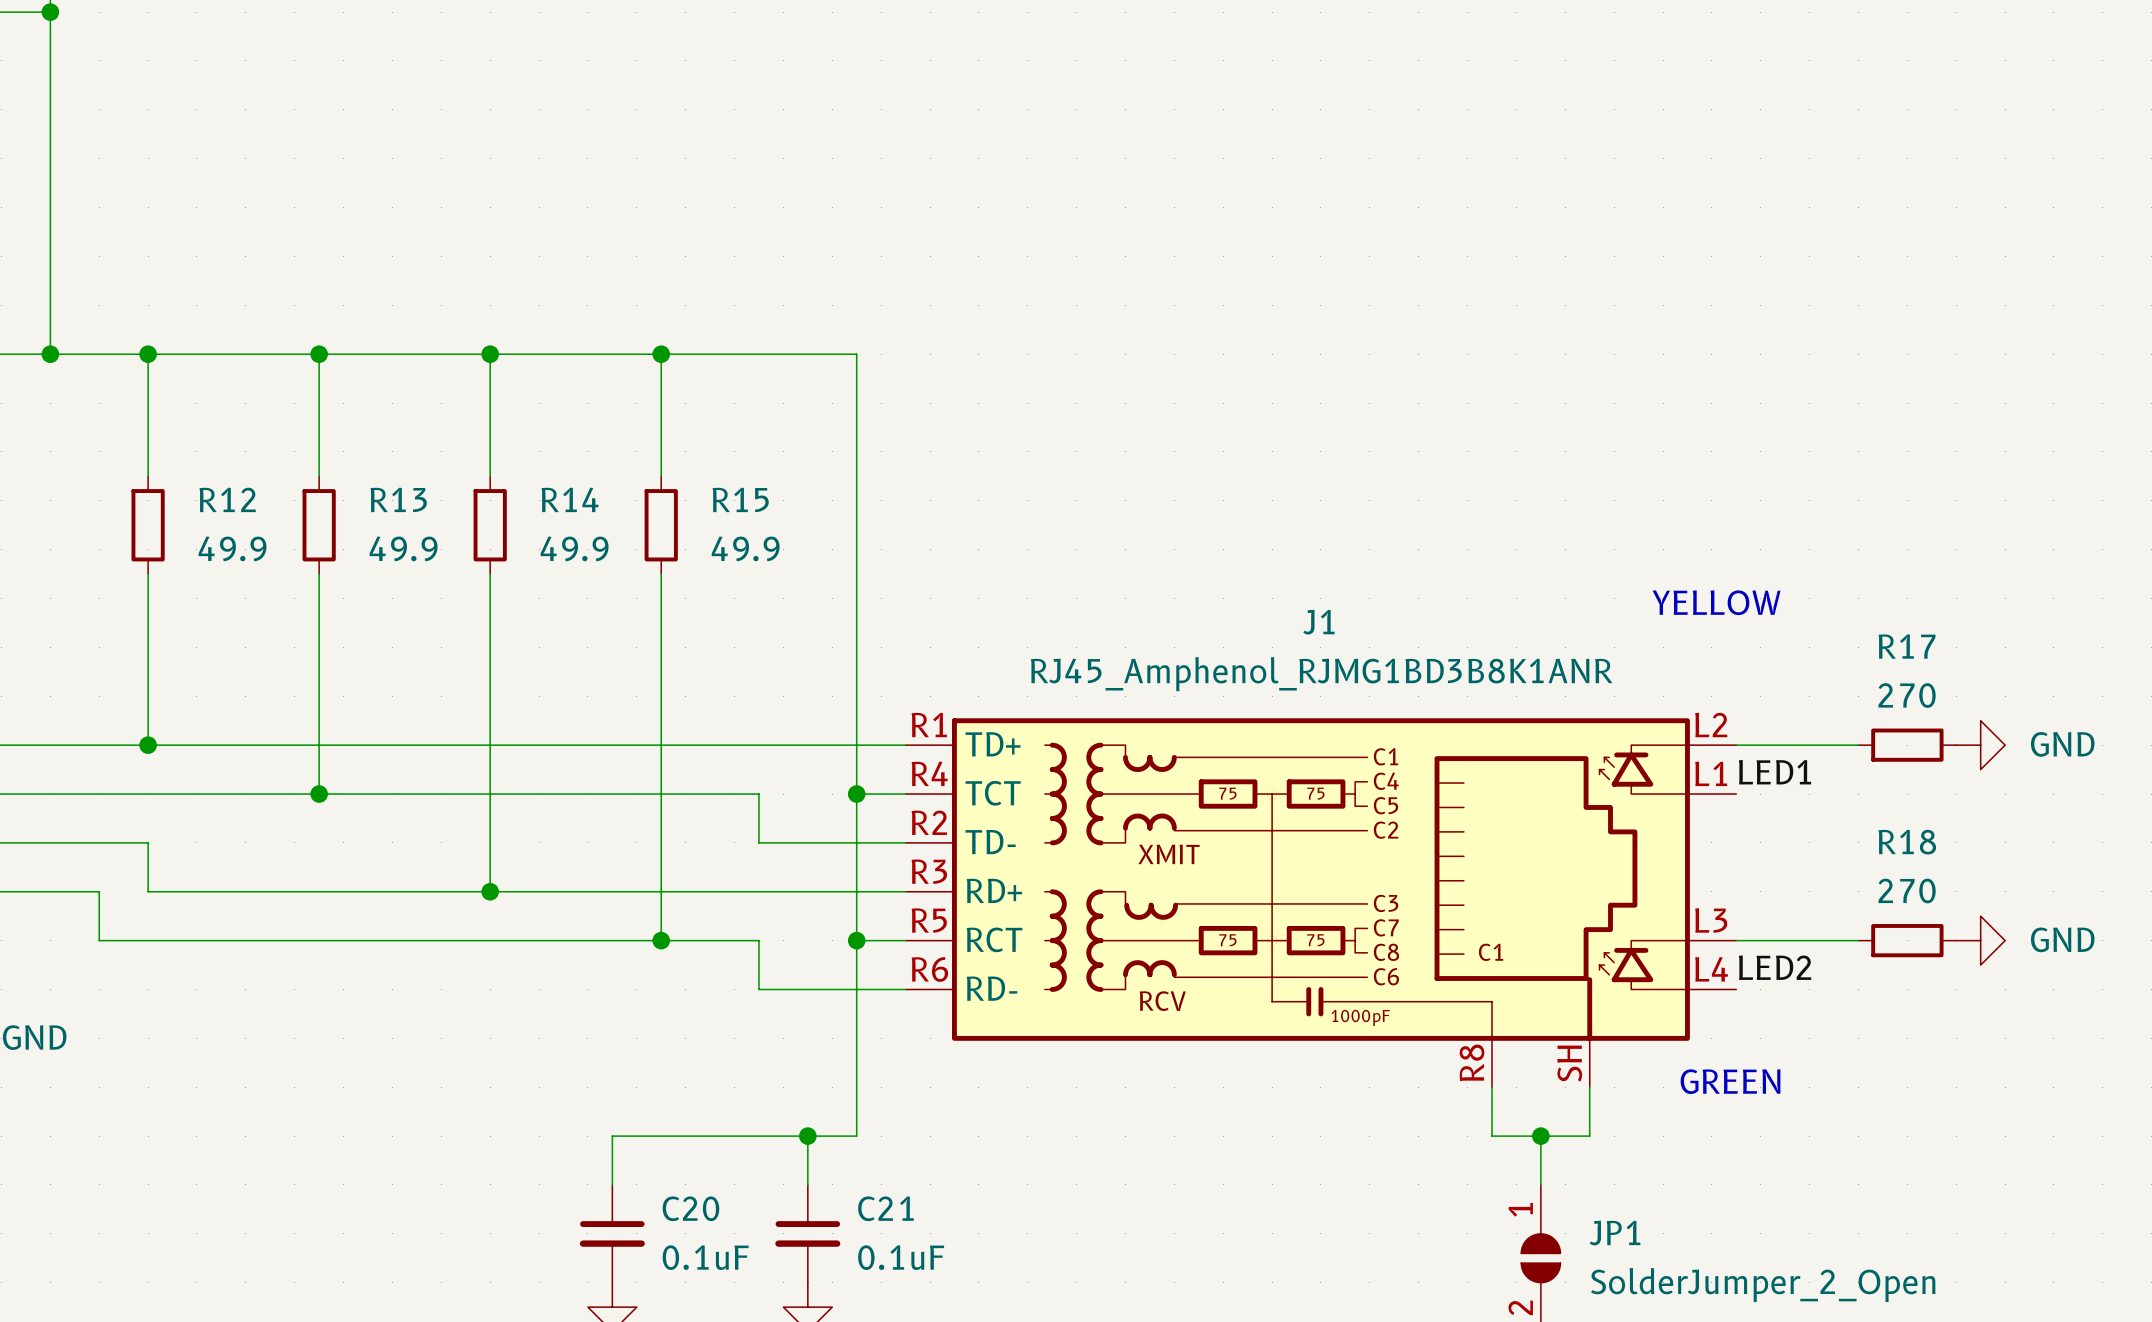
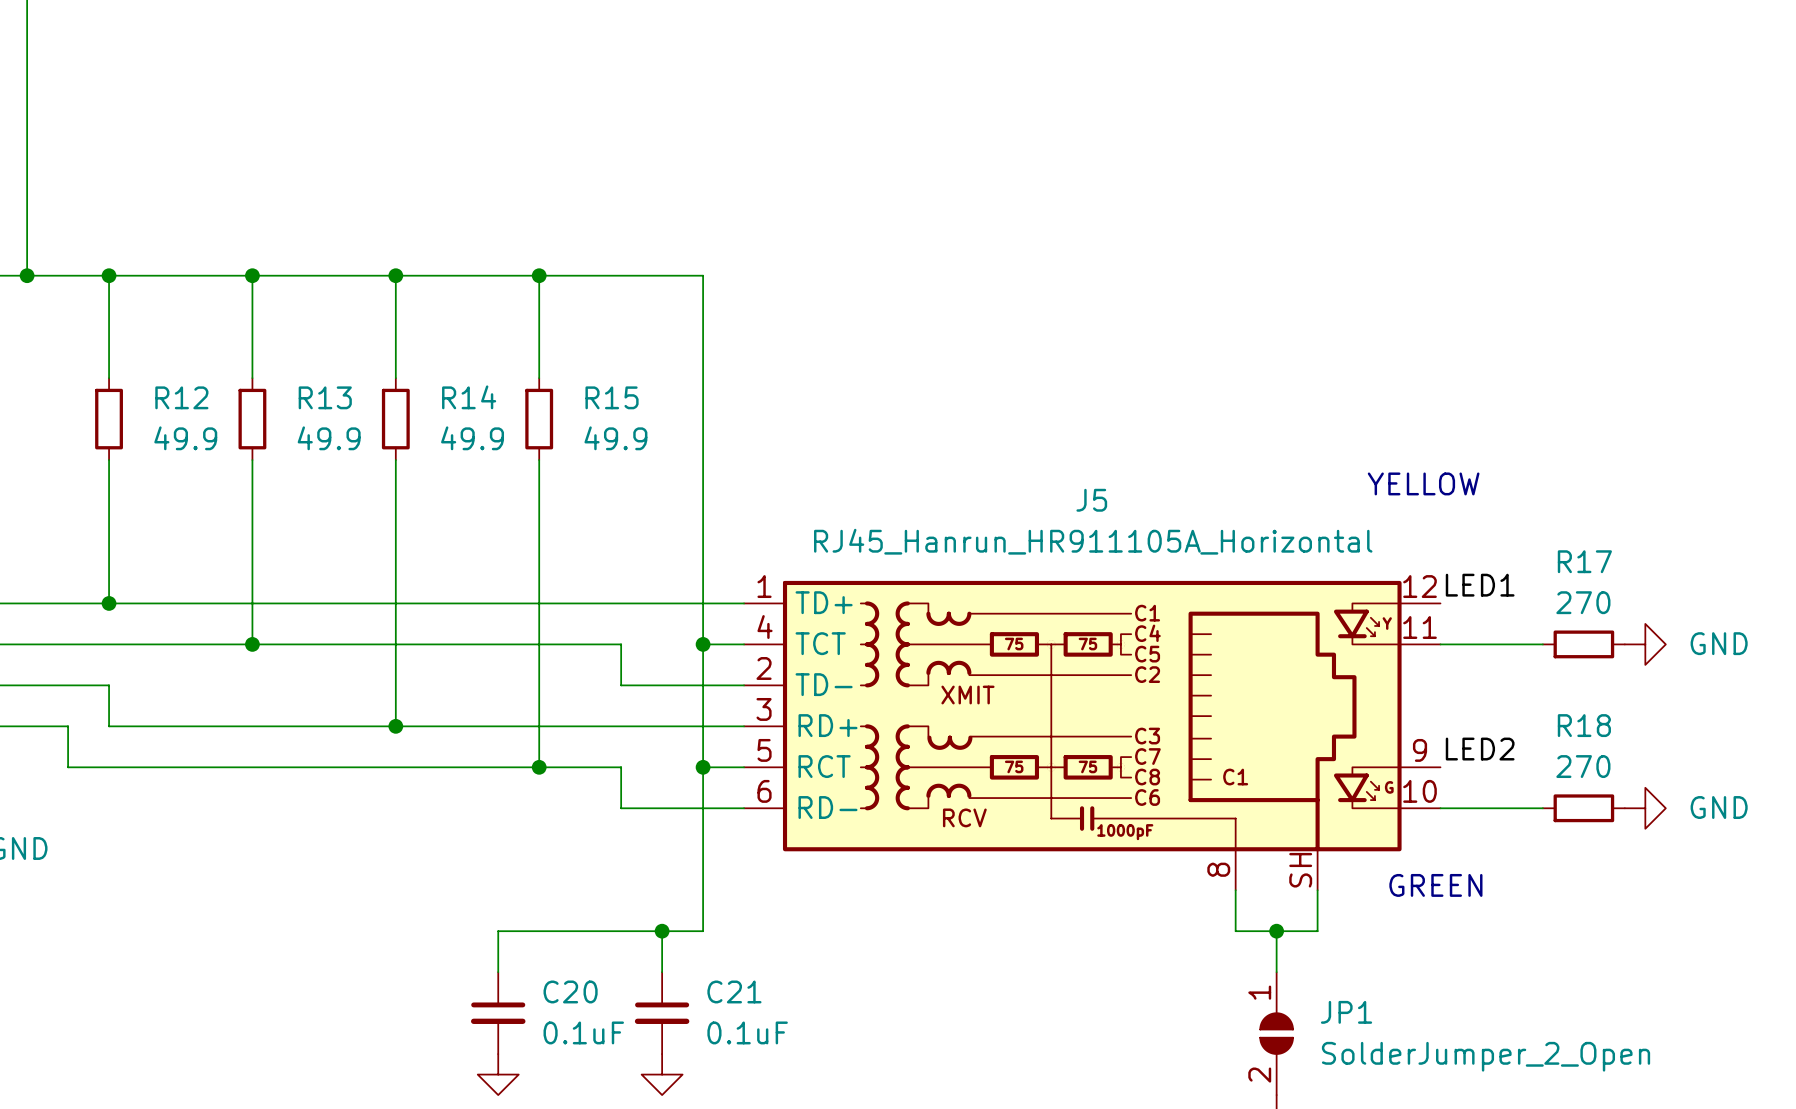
wire: (1736, 745) (1858, 745) -> (1440, 644) (1542, 644)
R17 position: (1907, 745) -> (1583, 644)
power symbol position: GND (1980, 745) -> GND (1645, 644)
label position: LED1 (1774, 772) -> LED1 (1480, 585)
J1: RJ45_Amphenol_RJMG1BD3B8K1ANR (1320, 902) -> none
J5: none -> RJ45_Hanrun_HR911105A_Horizontal (1092, 735)
wire: (1736, 940) (1858, 940) -> (1440, 808) (1542, 808)
R18 position: (1907, 940) -> (1583, 808)
power symbol position: GND (1980, 940) -> GND (1645, 808)
label position: LED2 (1775, 967) -> LED2 (1480, 749)

